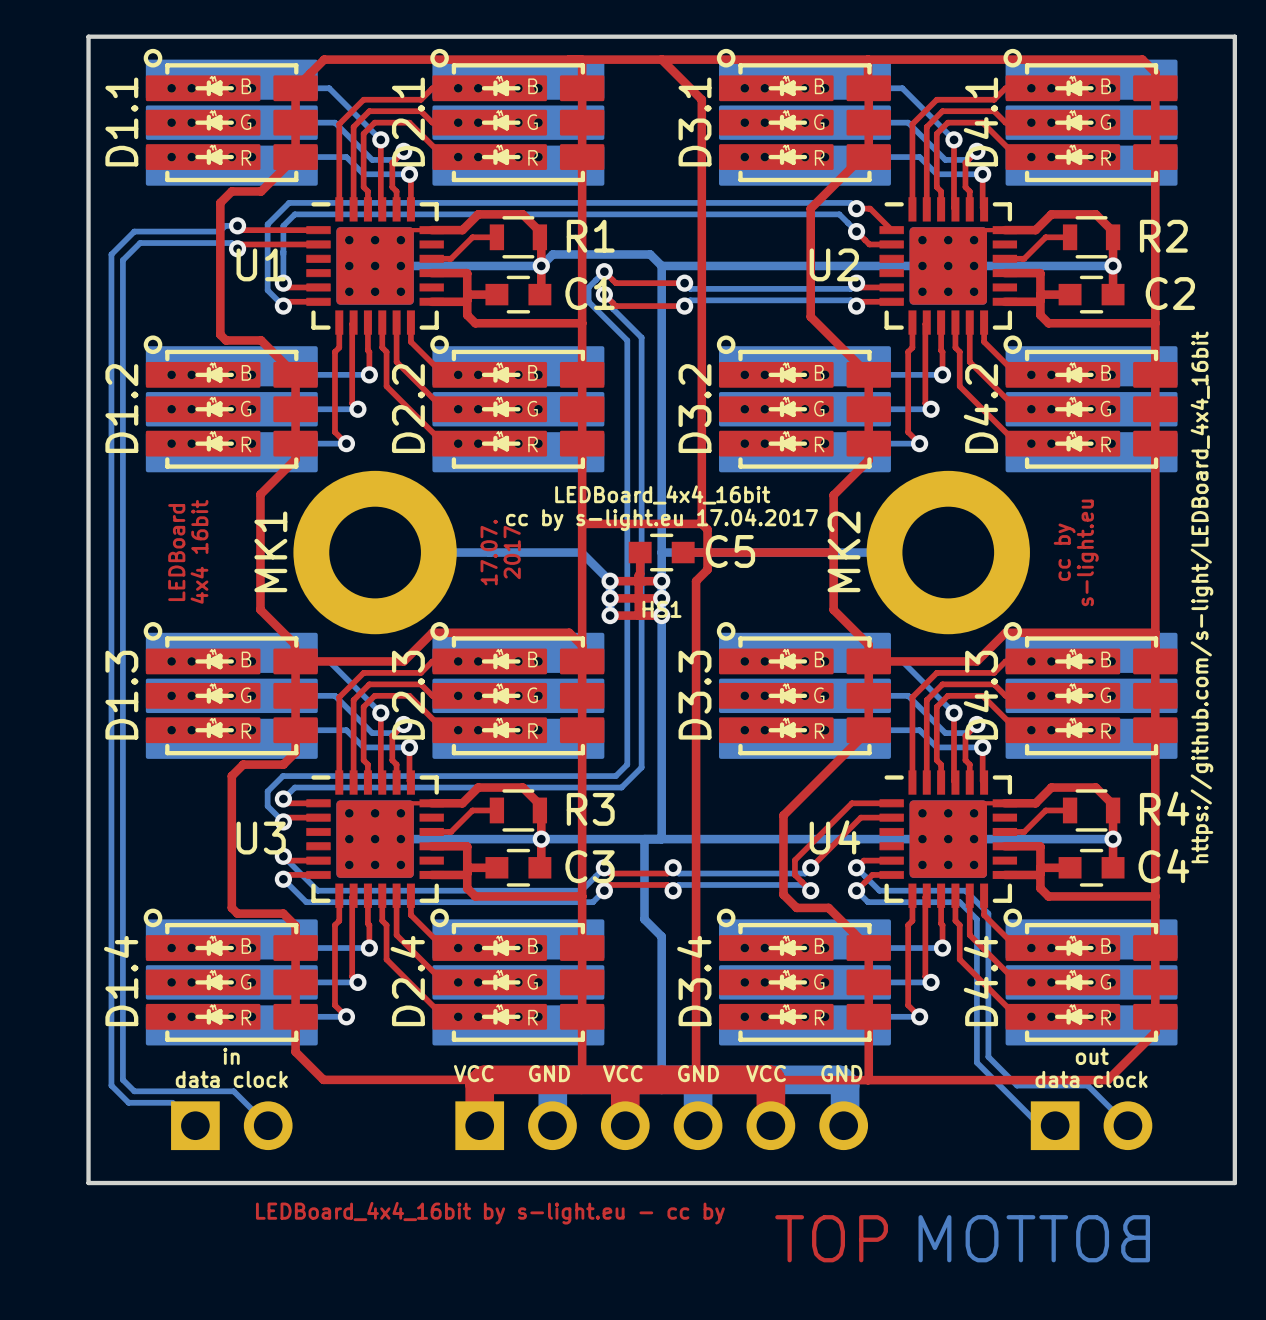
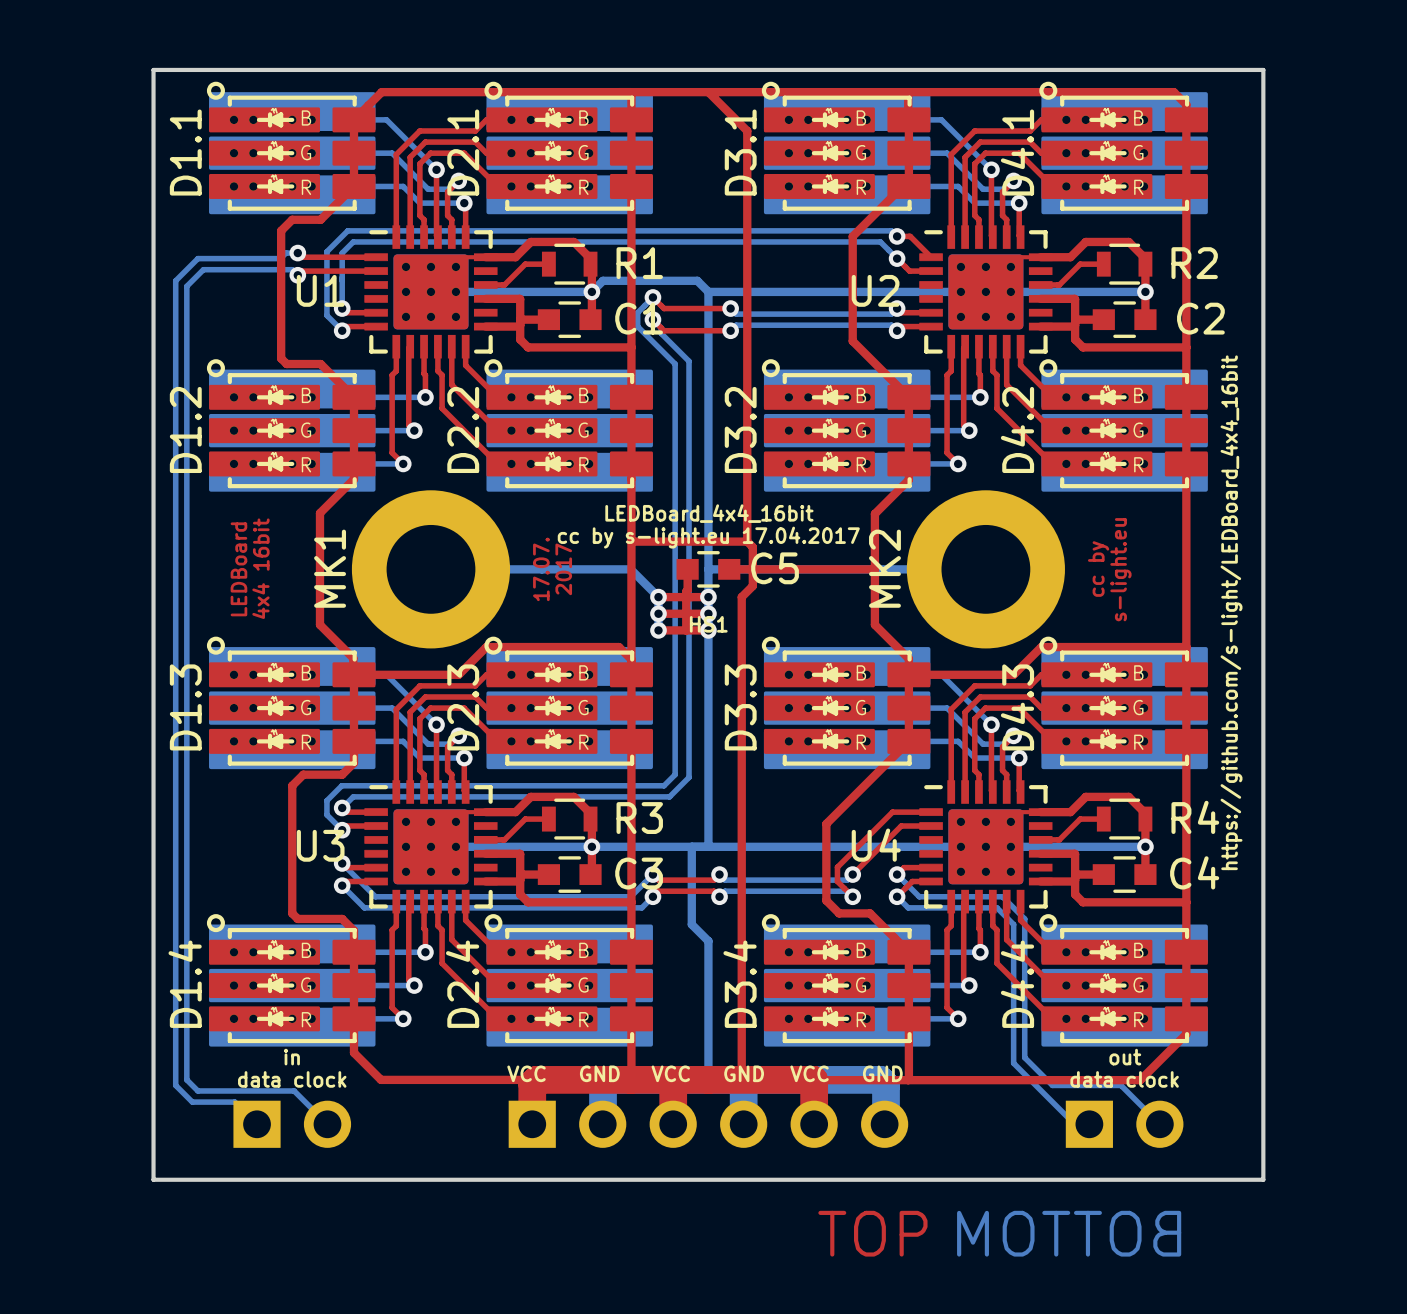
text: LEDBoard_4x4_16bit by s-light.eu - cc by (490, 1213) -> none

